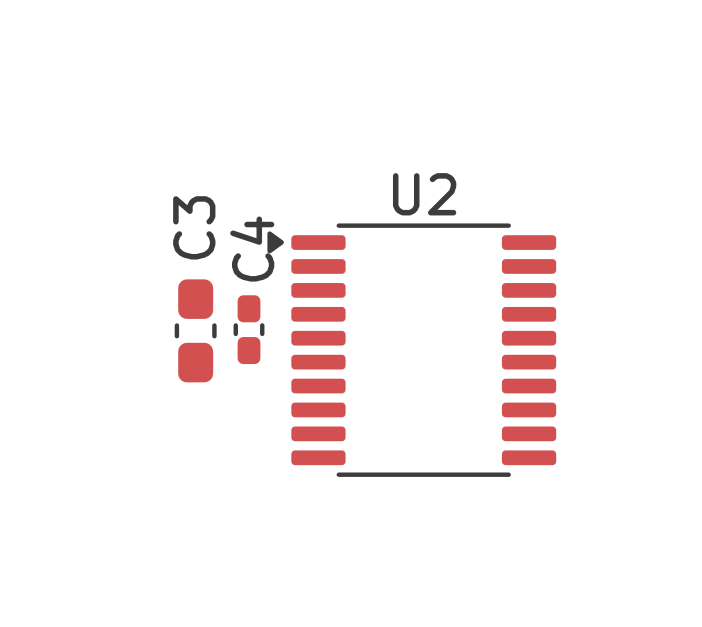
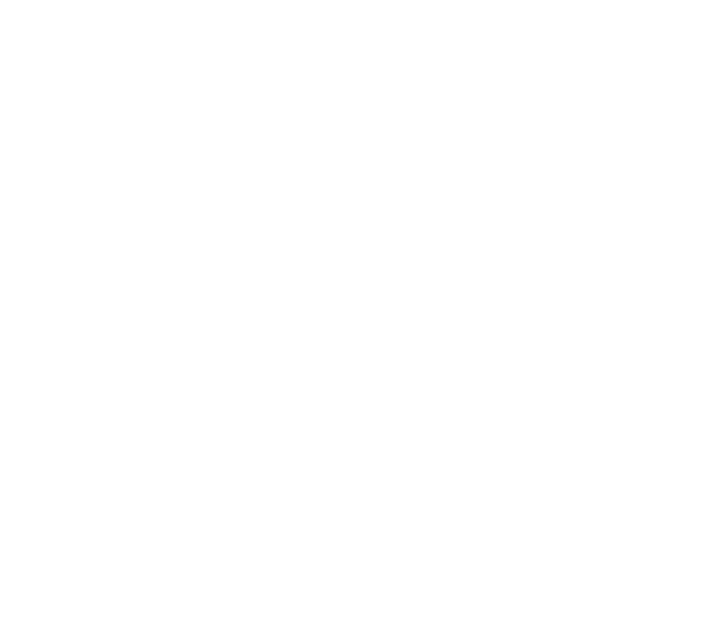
C4: (249, 329) -> none
C3: (195, 330) -> none
U2: (411, 350) -> none

